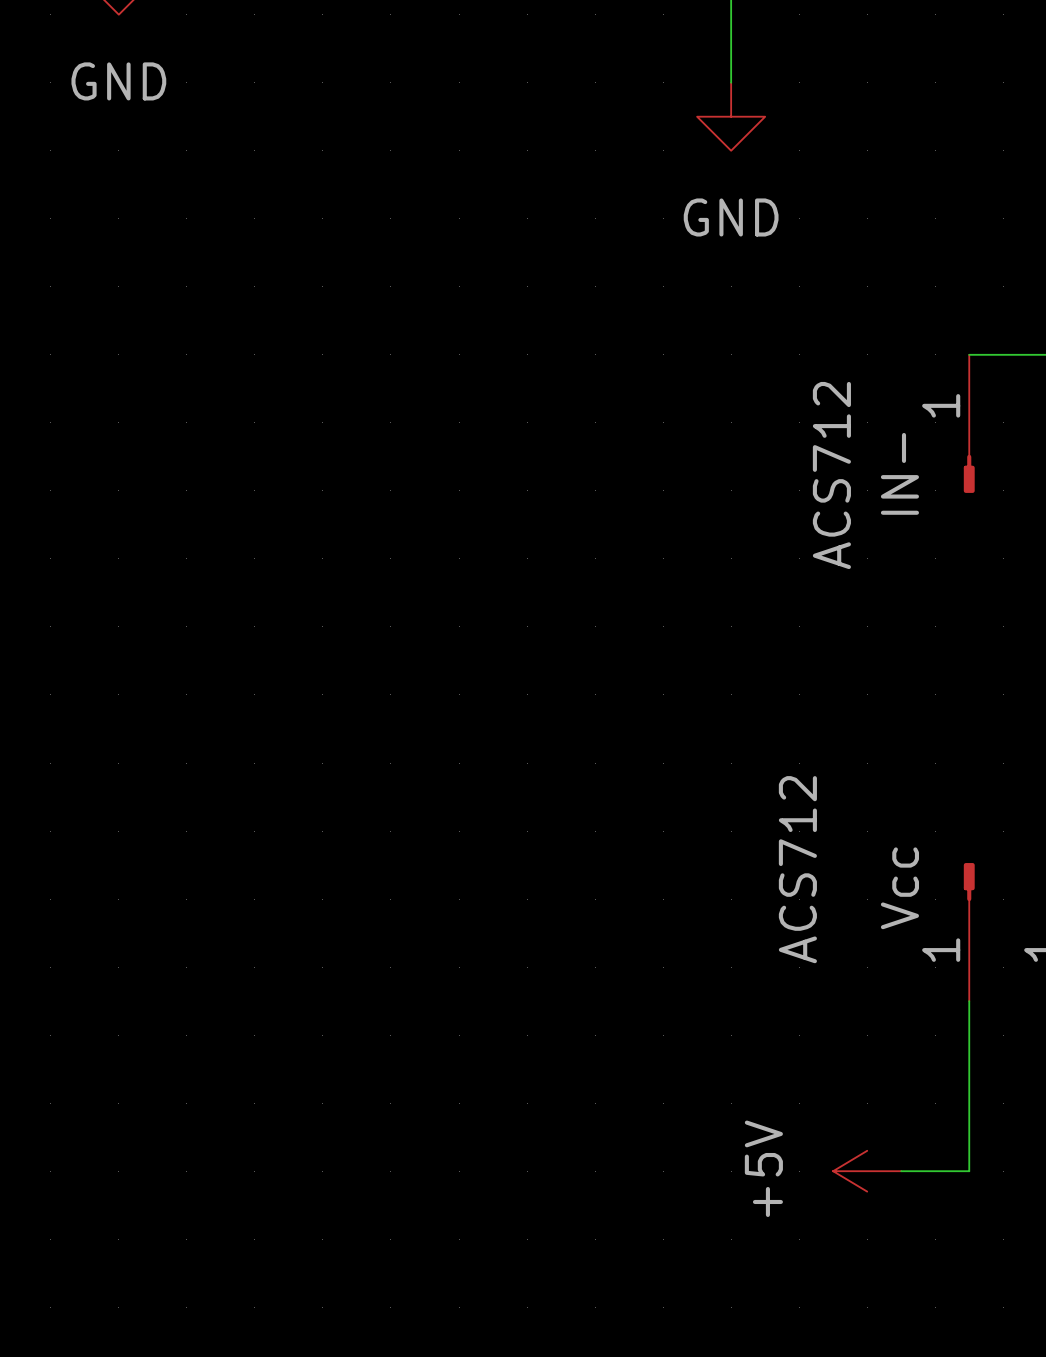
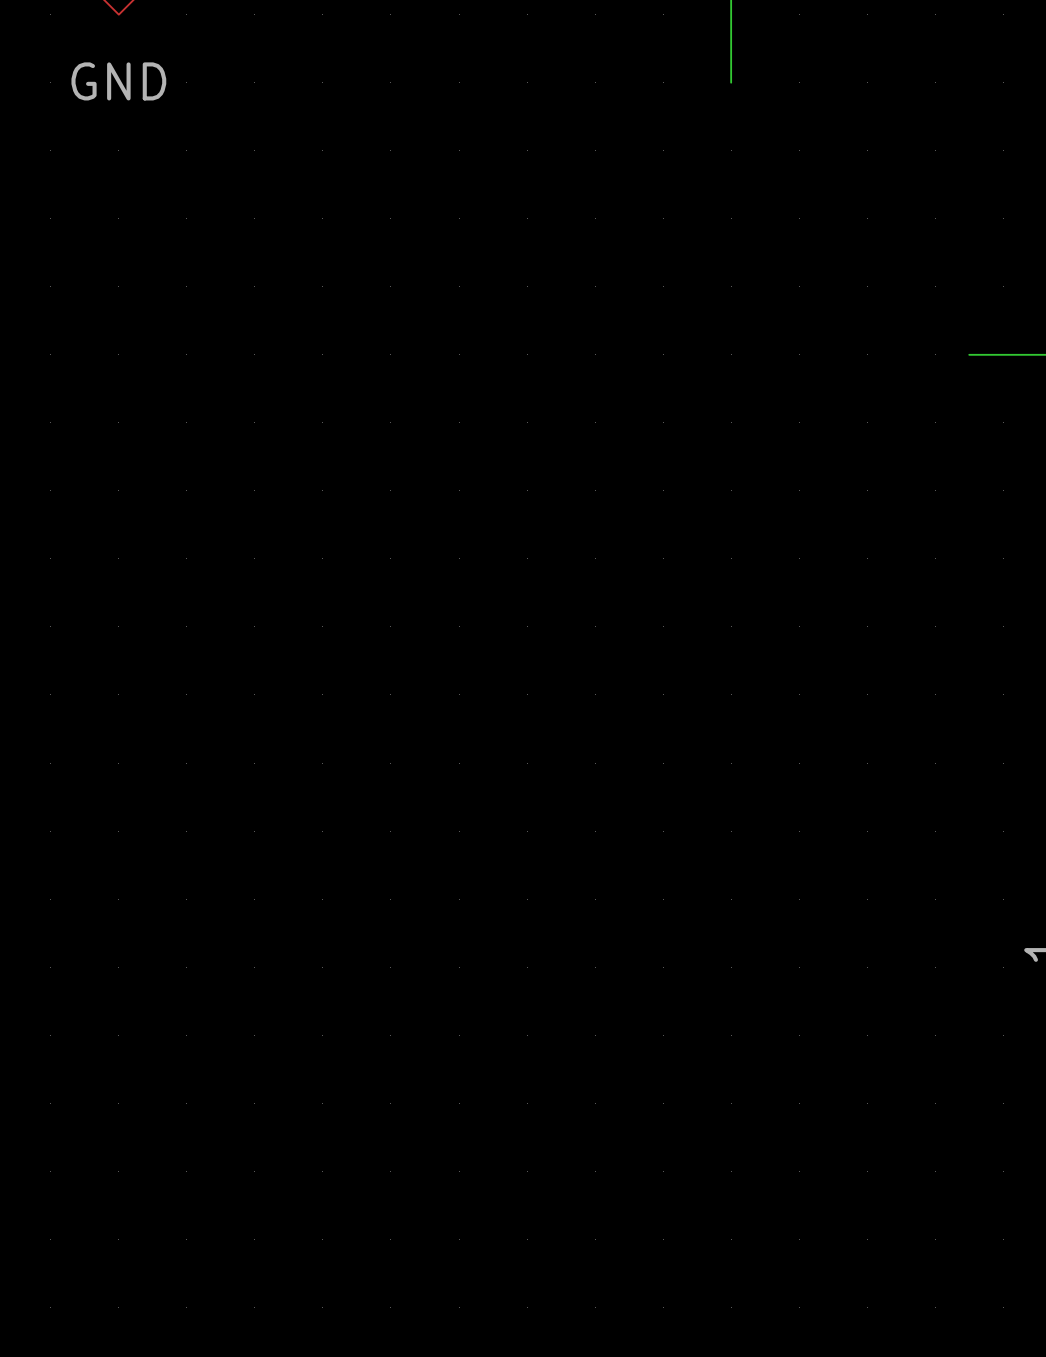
power symbol: GND (731, 116) -> none
ACS712: IN- (969, 423) -> none
ACS712: Vcc (969, 932) -> none
wire: (969, 1001) (969, 1171) (901, 1171) -> none
power symbol: +5V (867, 1171) -> none

